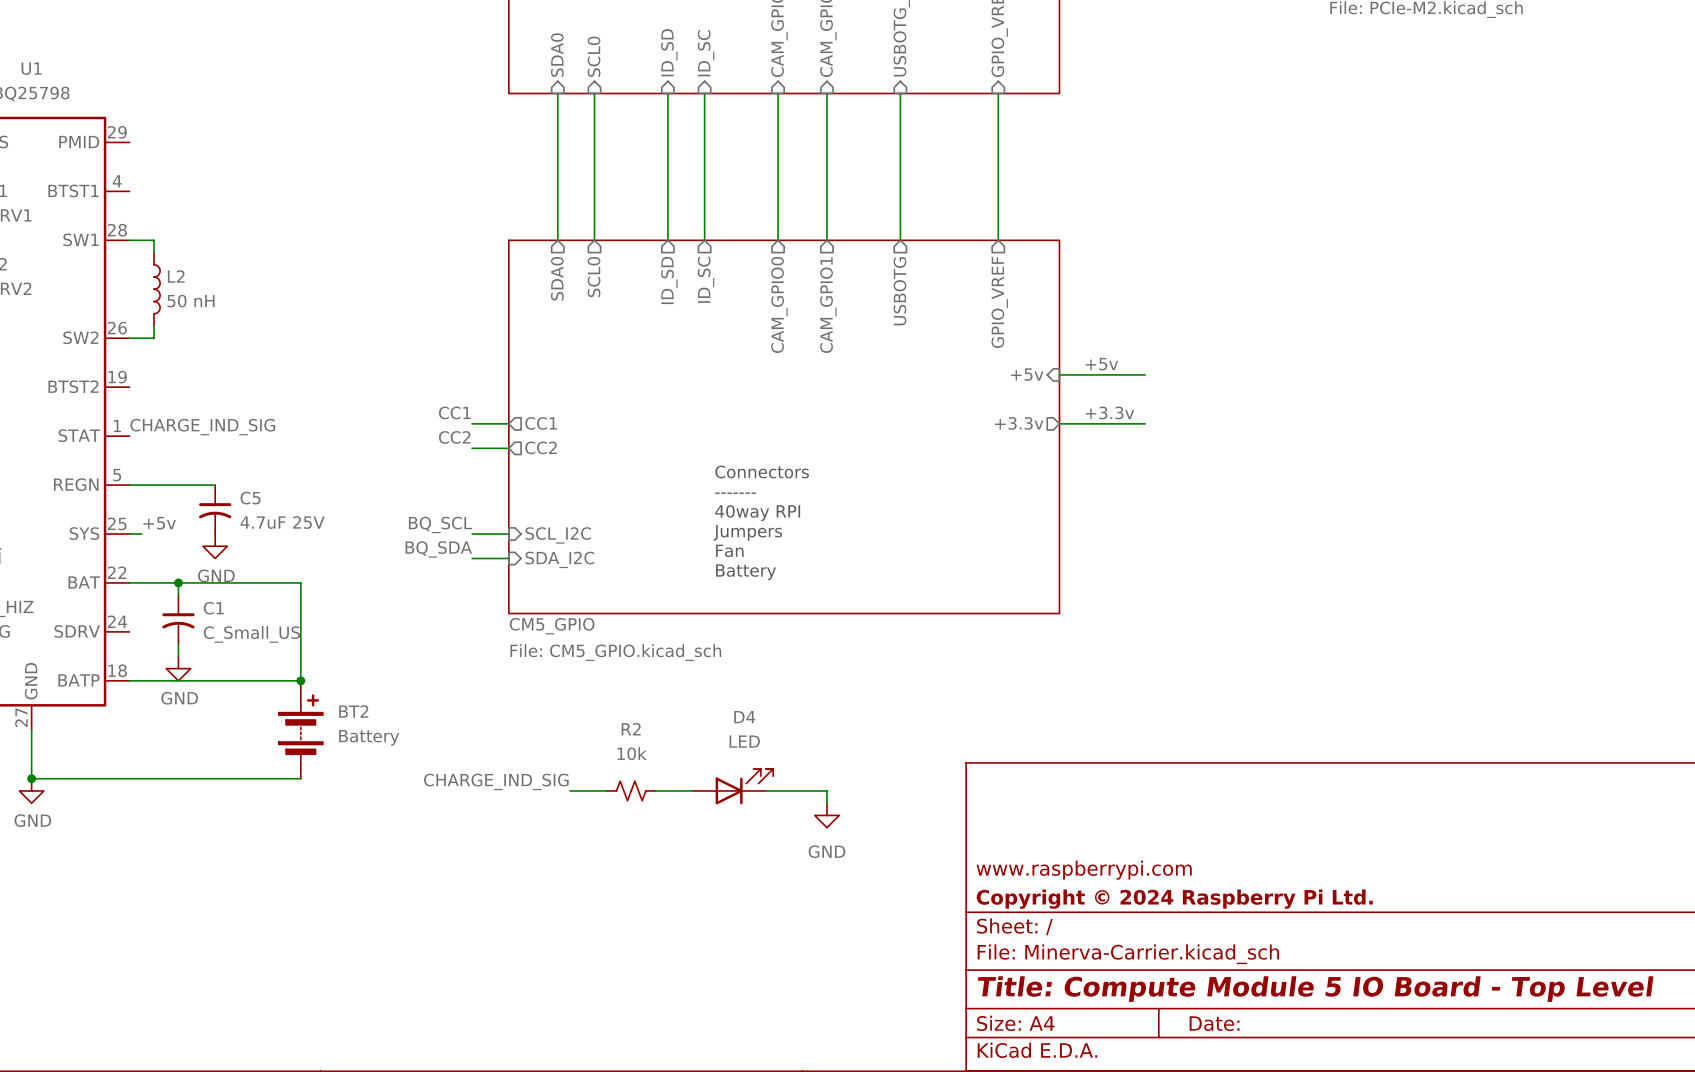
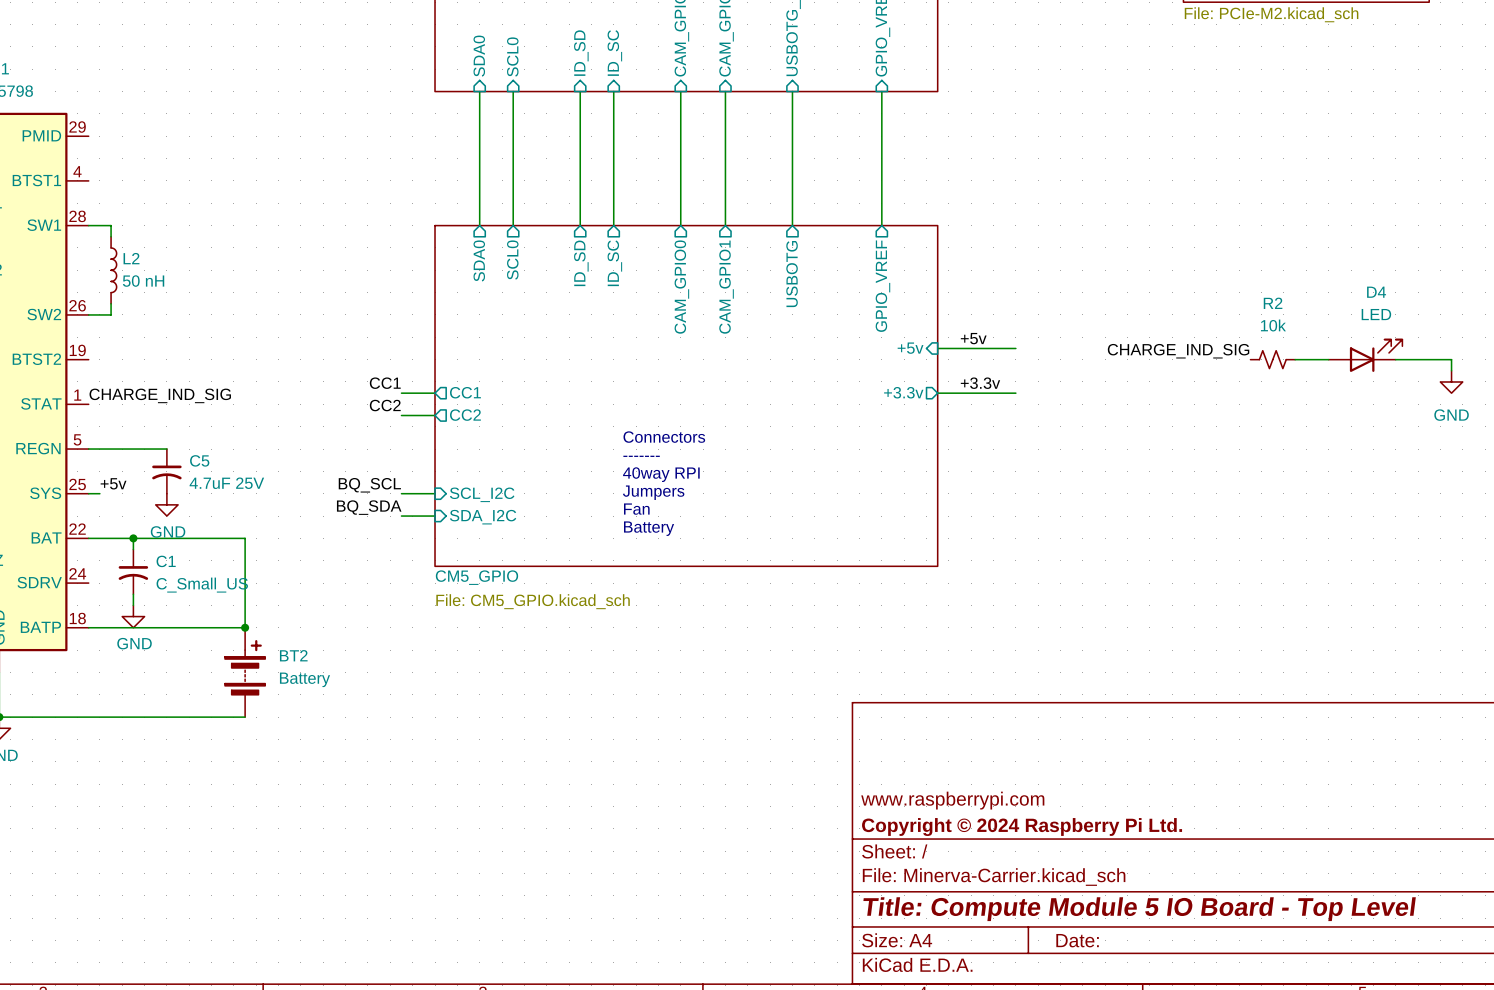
label: none -> CHARGE_IND_SIG (1178, 351)
wire: none -> (1295, 359) (1328, 359)
wire: none -> (1395, 359) (1451, 359) (1451, 370)
power symbol: none -> GND (1451, 381)
label: CHARGE_IND_SIG (496, 781) -> none
D4 position: (732, 786) -> (1365, 355)
wire: (570, 790) (606, 790) -> none
R2 position: (631, 790) -> (1272, 359)
wire: (655, 790) (692, 790) -> none
wire: (765, 790) (826, 790) (826, 803) -> none
power symbol: GND (826, 815) -> none

